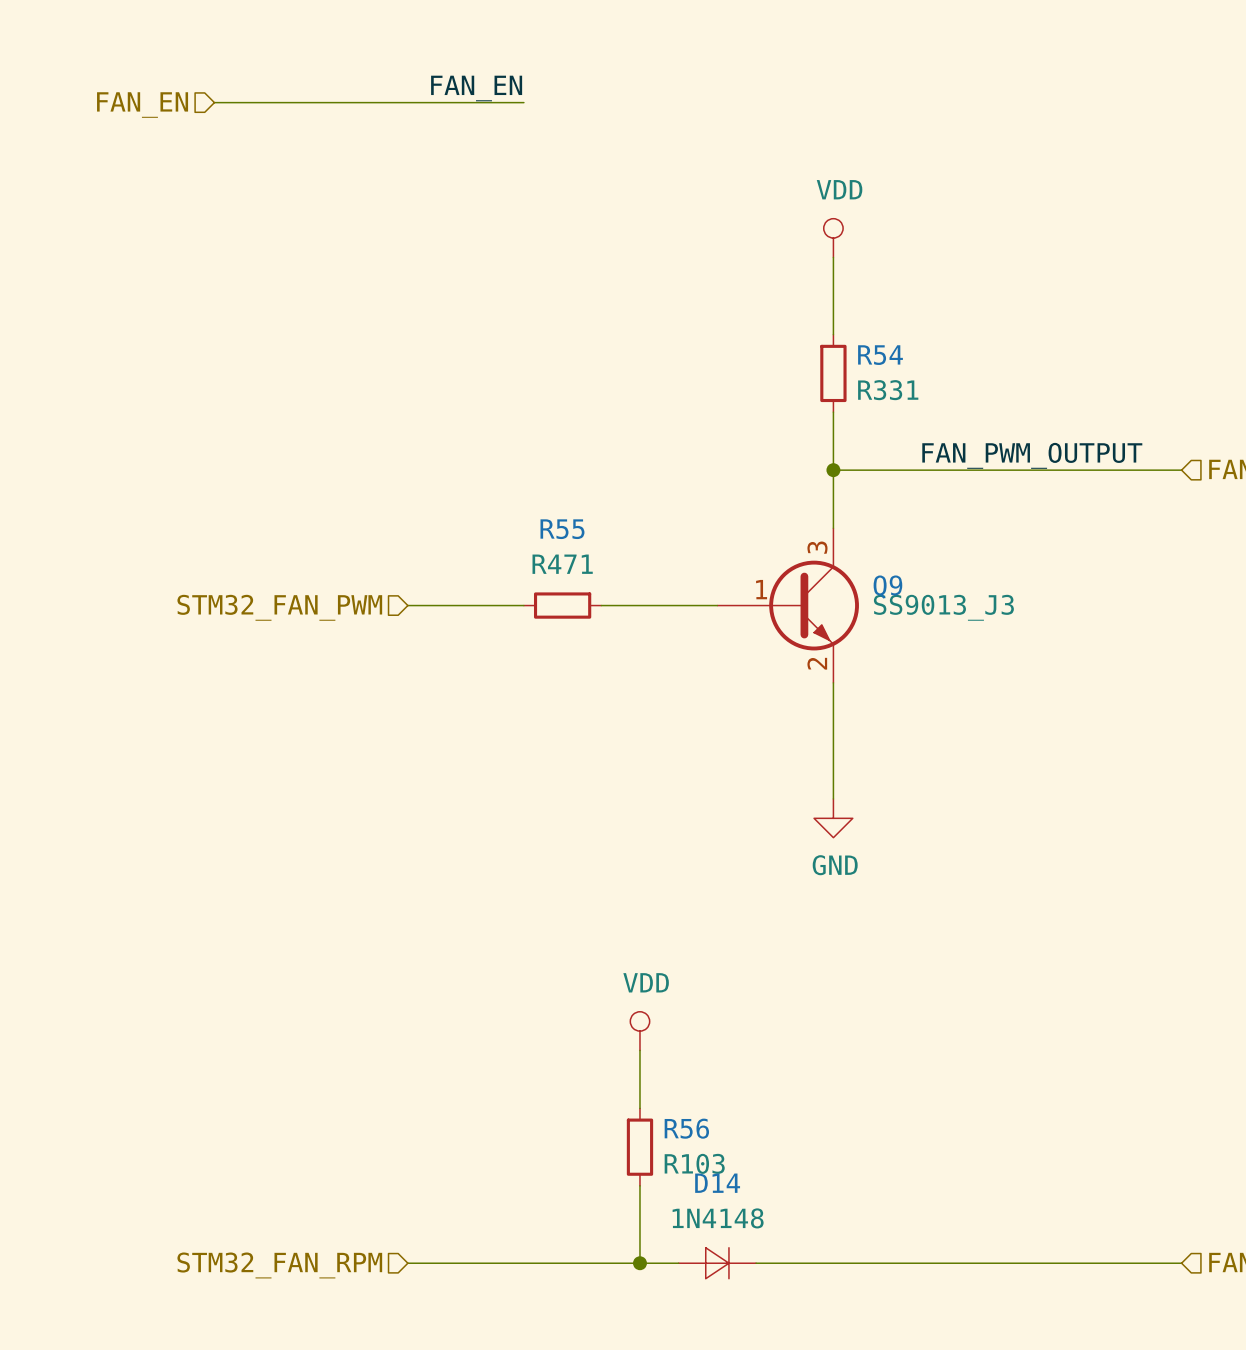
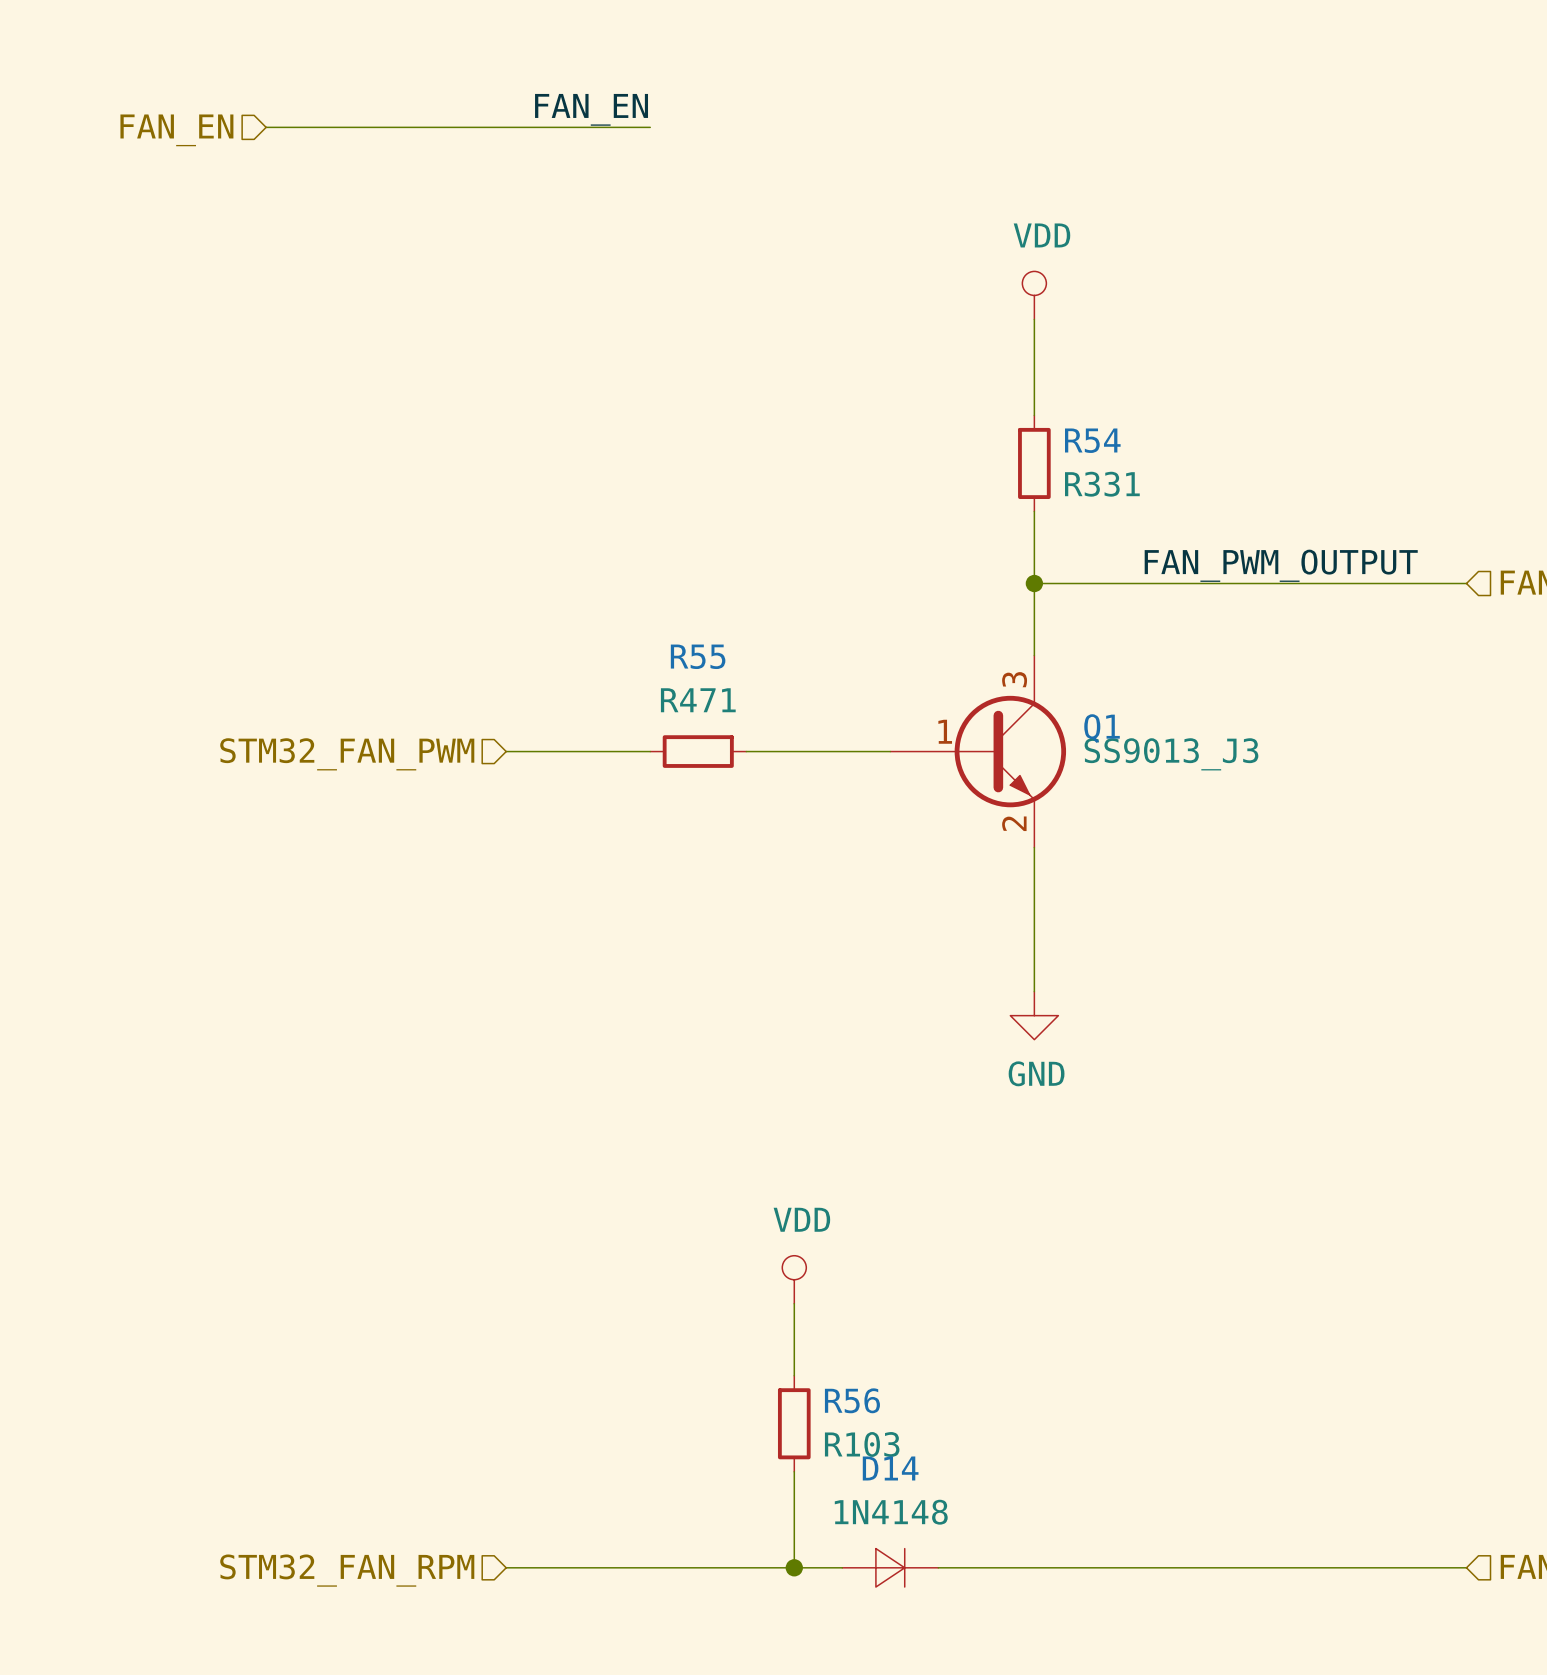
Q9 name: Q9 (887, 587) -> Q1 (1102, 728)

